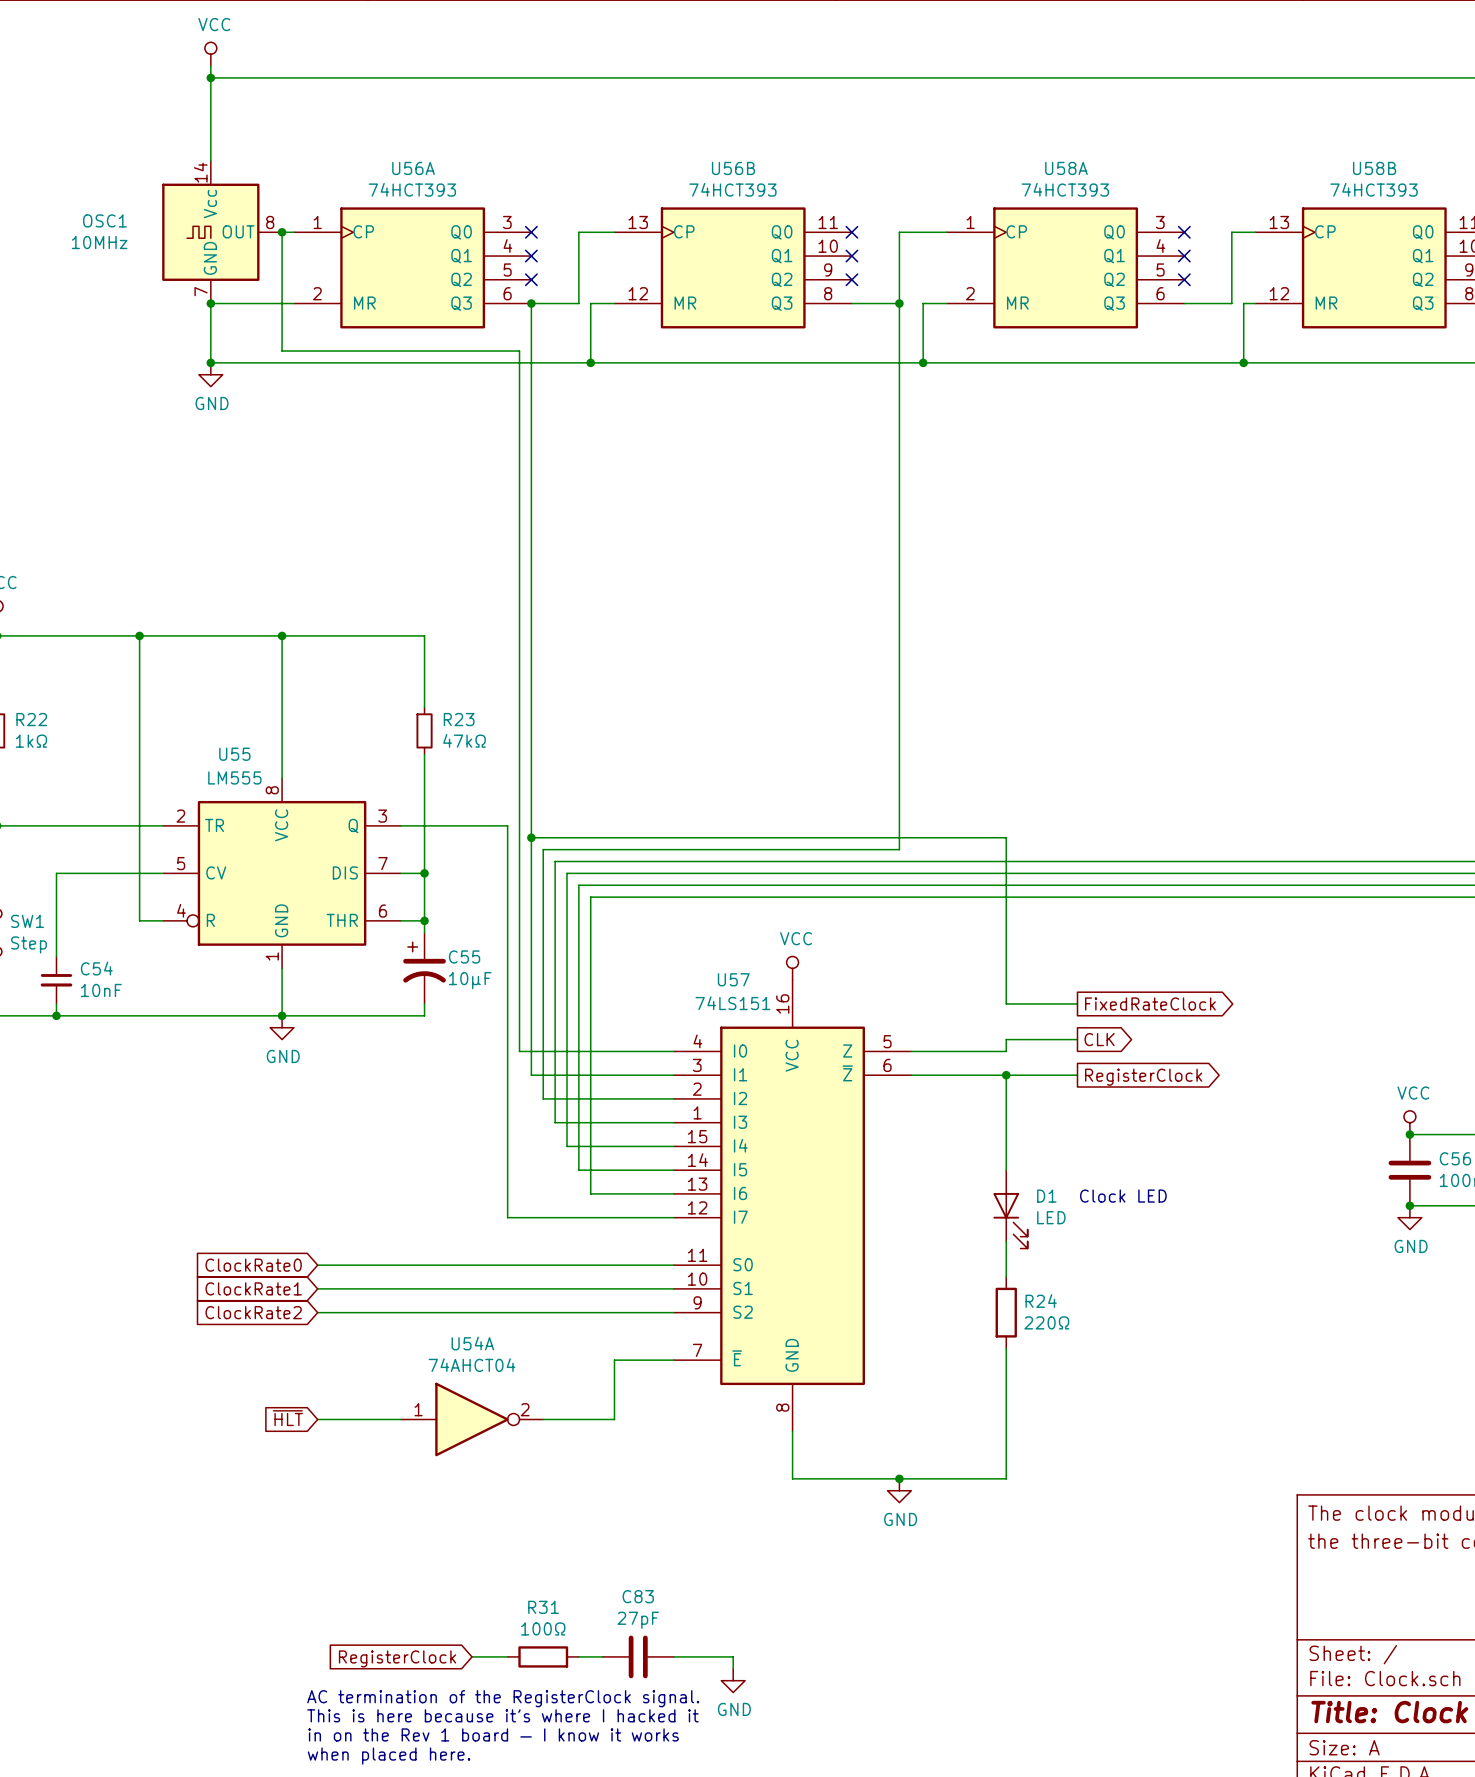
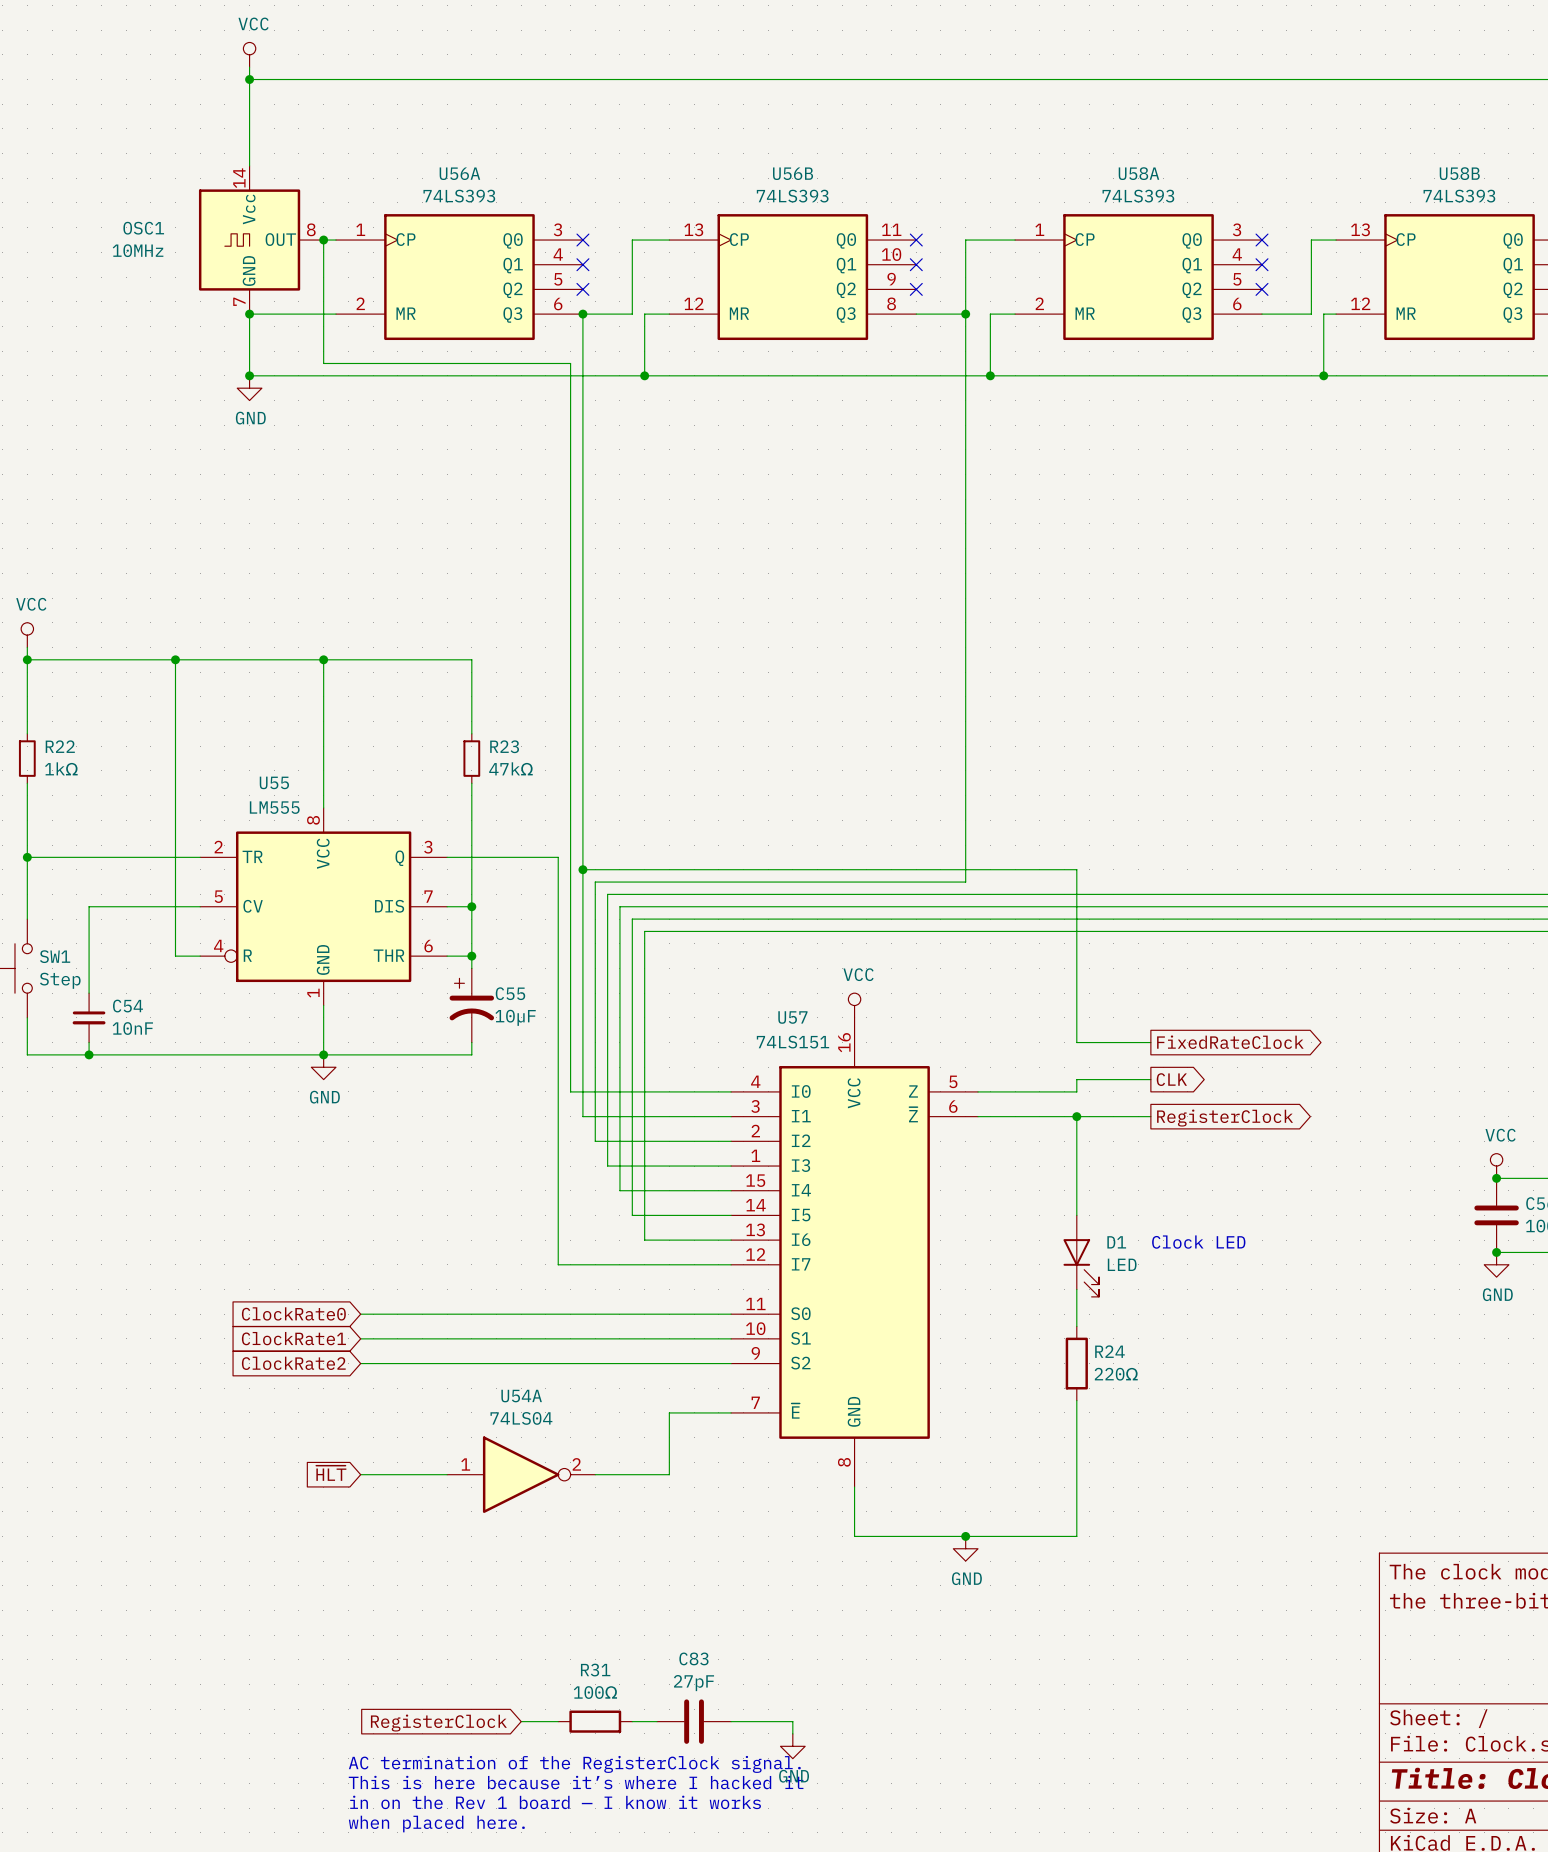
U56A value: 74HCT393 (412, 189) -> 74LS393 (459, 196)
U56B value: 74HCT393 (732, 189) -> 74LS393 (792, 196)
U58A value: 74HCT393 (1065, 189) -> 74LS393 (1138, 196)
U58B value: 74HCT393 (1374, 189) -> 74LS393 (1459, 196)
U54A value: 74AHCT04 (472, 1365) -> 74LS04 (521, 1418)

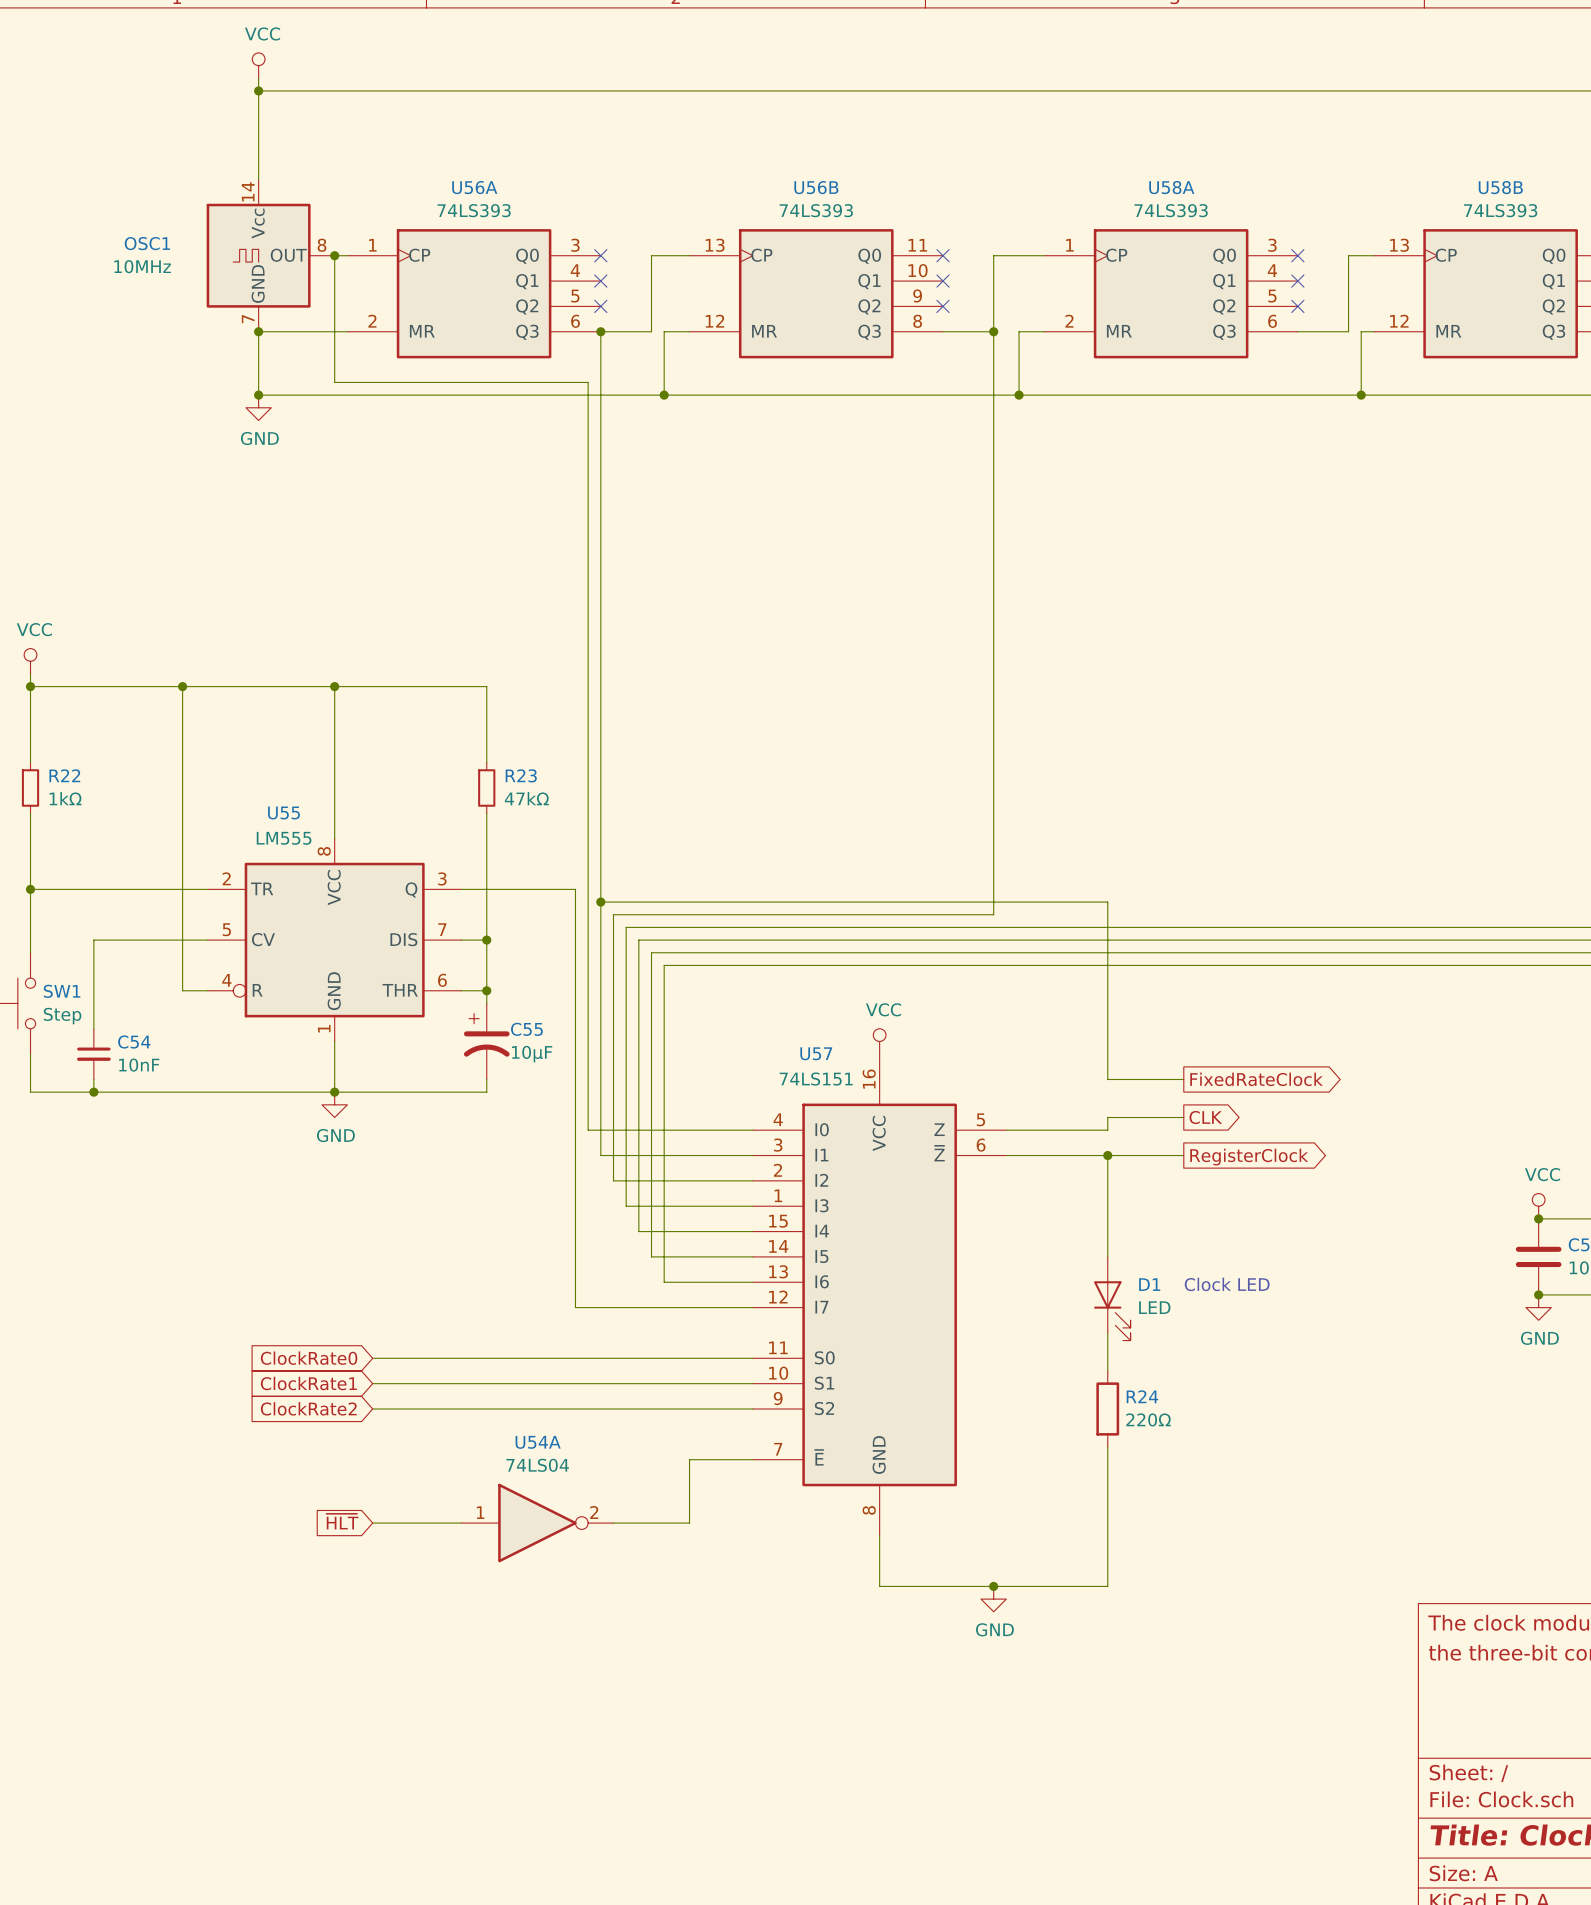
wire: (521, 1721) (558, 1721) -> none
R31: 100Ω (595, 1721) -> none
wire: (632, 1721) (657, 1721) -> none
C83: 27pF (694, 1721) -> none
wire: (731, 1721) (792, 1721) (792, 1733) -> none
global label: RegisterClock (438, 1723) -> none
power symbol: GND (792, 1746) -> none
text: AC termination of the RegisterClock signal. (574, 1764) -> none
text: This is here because it’s where I hacked it (576, 1782) -> none
text: in on the Rev 1 board — I know it works (555, 1802) -> none
text: when placed here. (436, 1824) -> none

